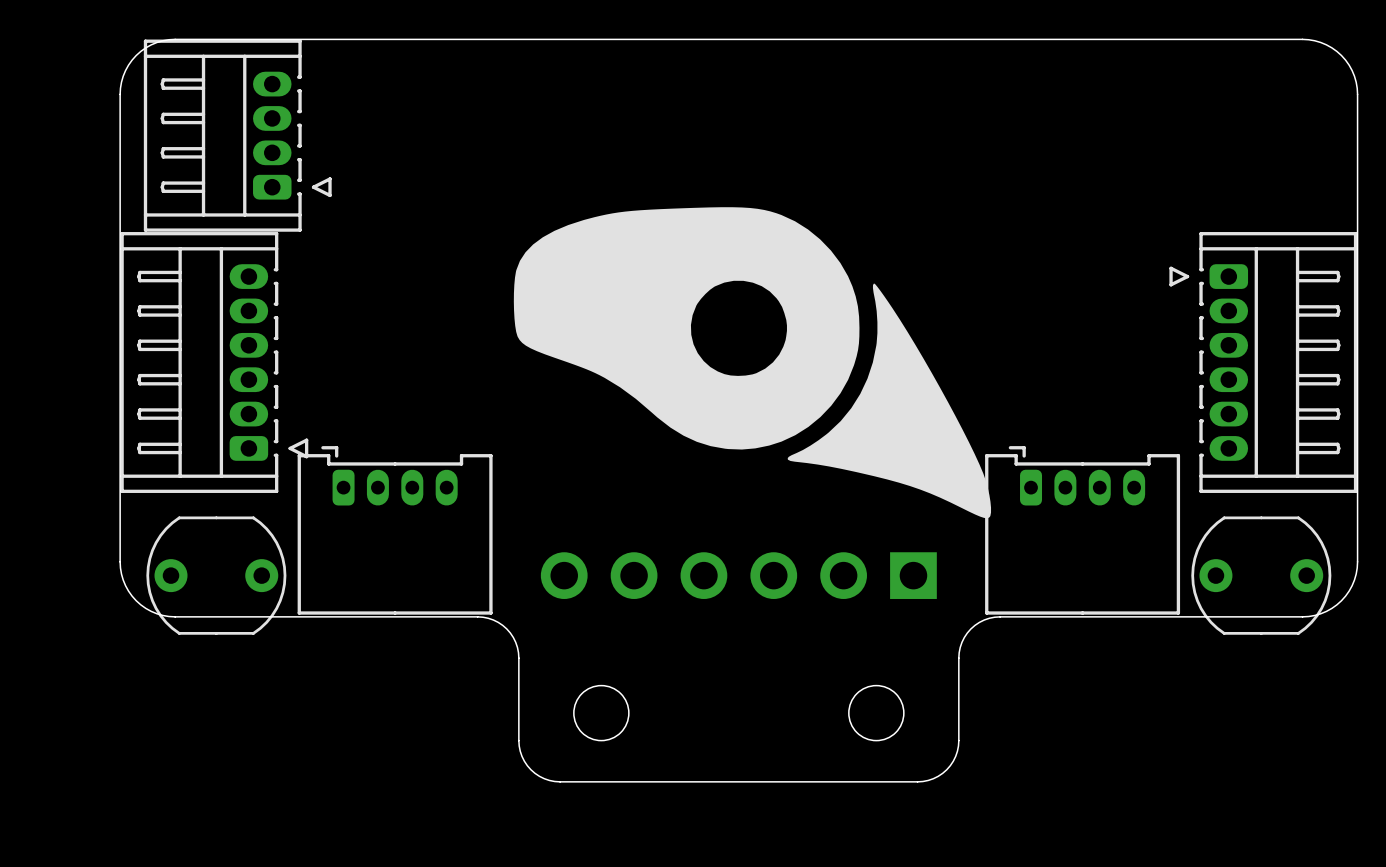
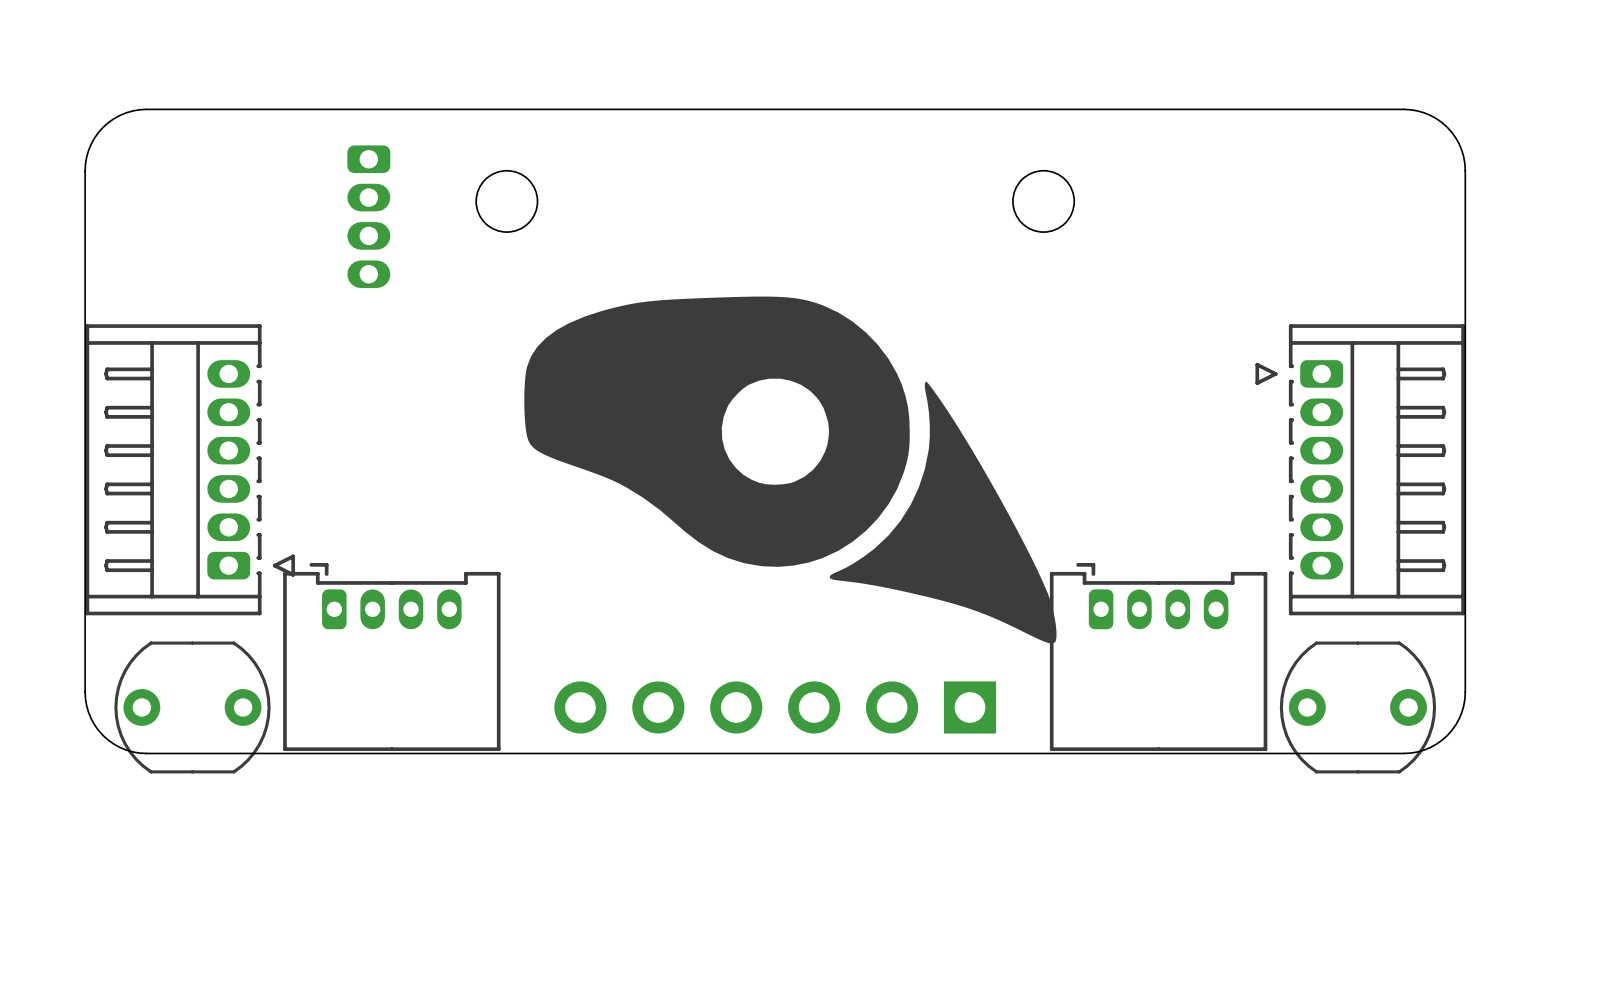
round board edge: none -> [475, 169, 539, 233]
round board edge: none -> [1012, 169, 1076, 233]
part side: top (237, 135) -> bottom (368, 216)
board edge: (477, 616) (493, 620) (502, 625) (513, 637) (517, 647) (518, 740) (524, 761) (539, 776) (560, 781) (917, 781) (933, 778) (946, 769) (957, 751) (958, 658) (961, 642) (974, 625) (984, 620) (1000, 616) -> (483, 753) (1066, 753)
round board edge: [573, 684, 630, 742] -> none
round board edge: [848, 684, 905, 742] -> none

